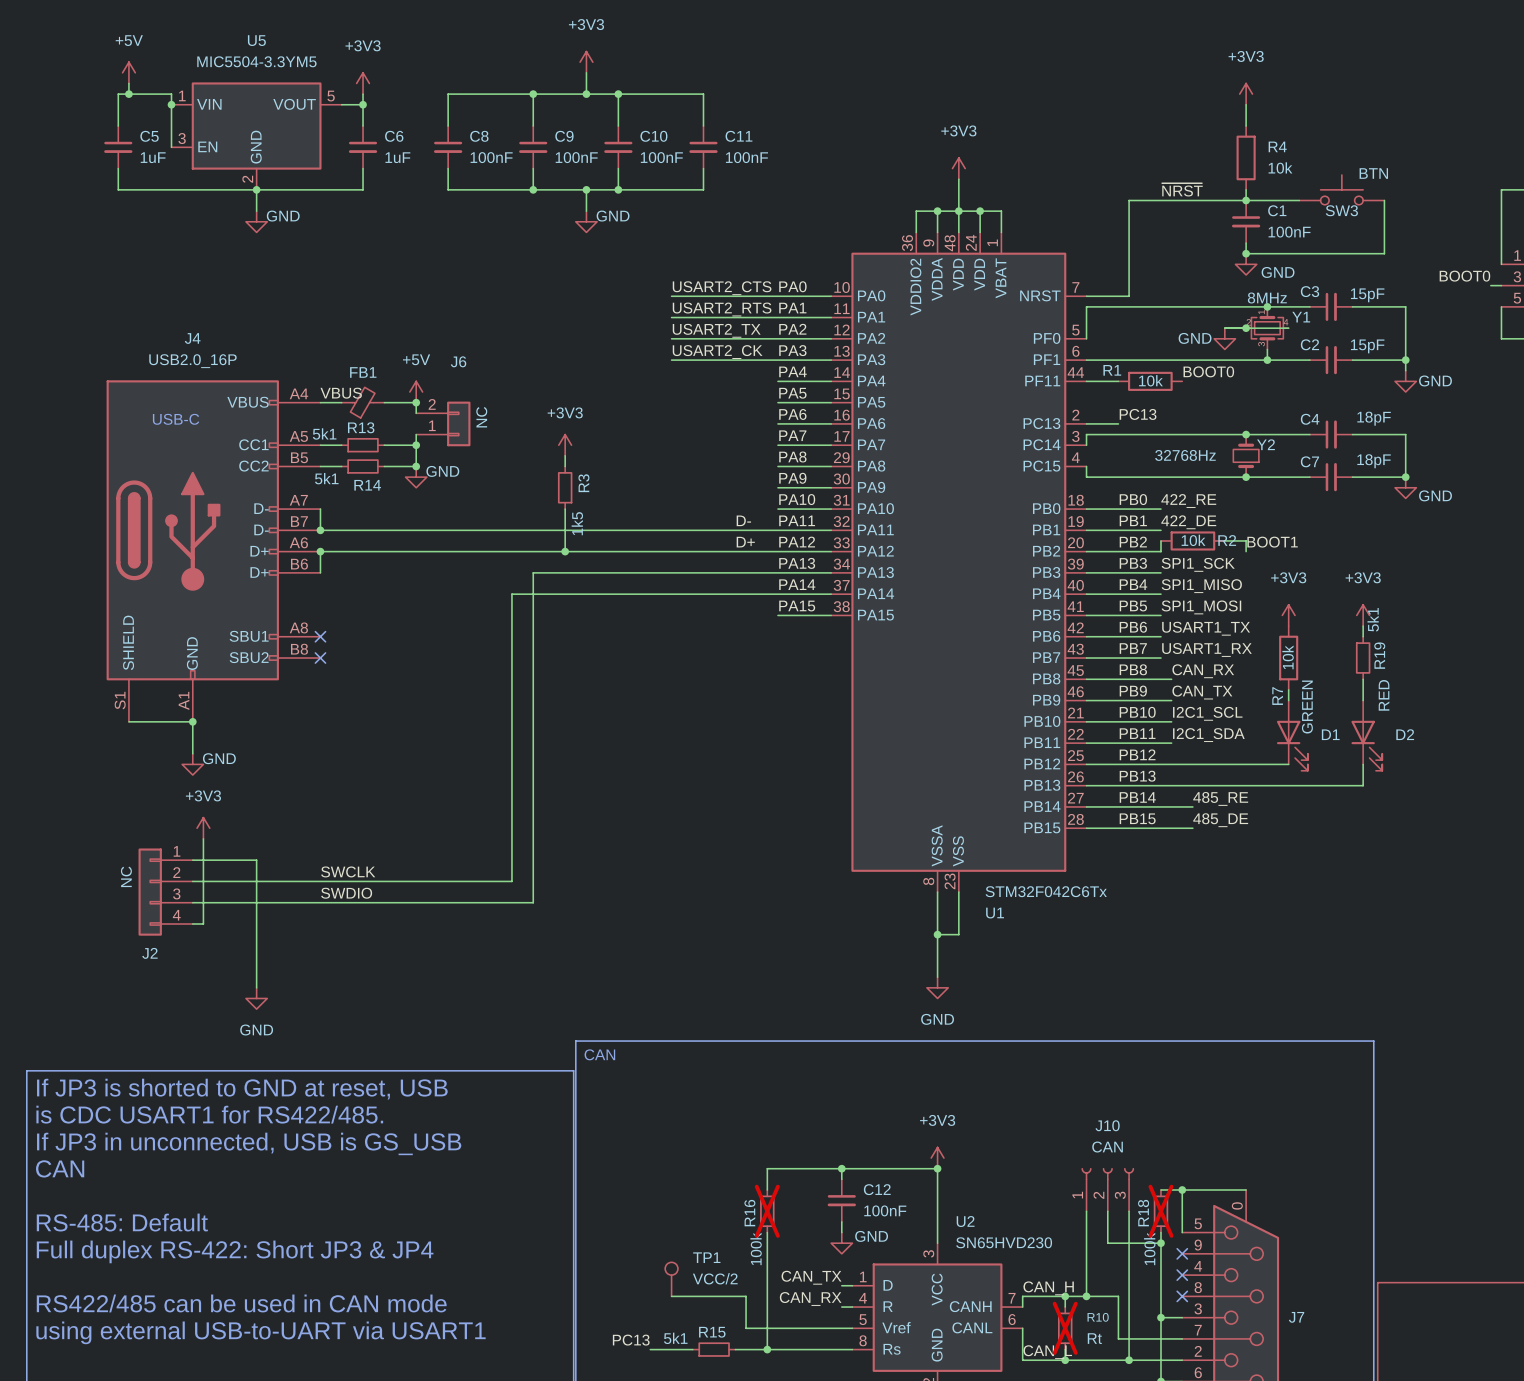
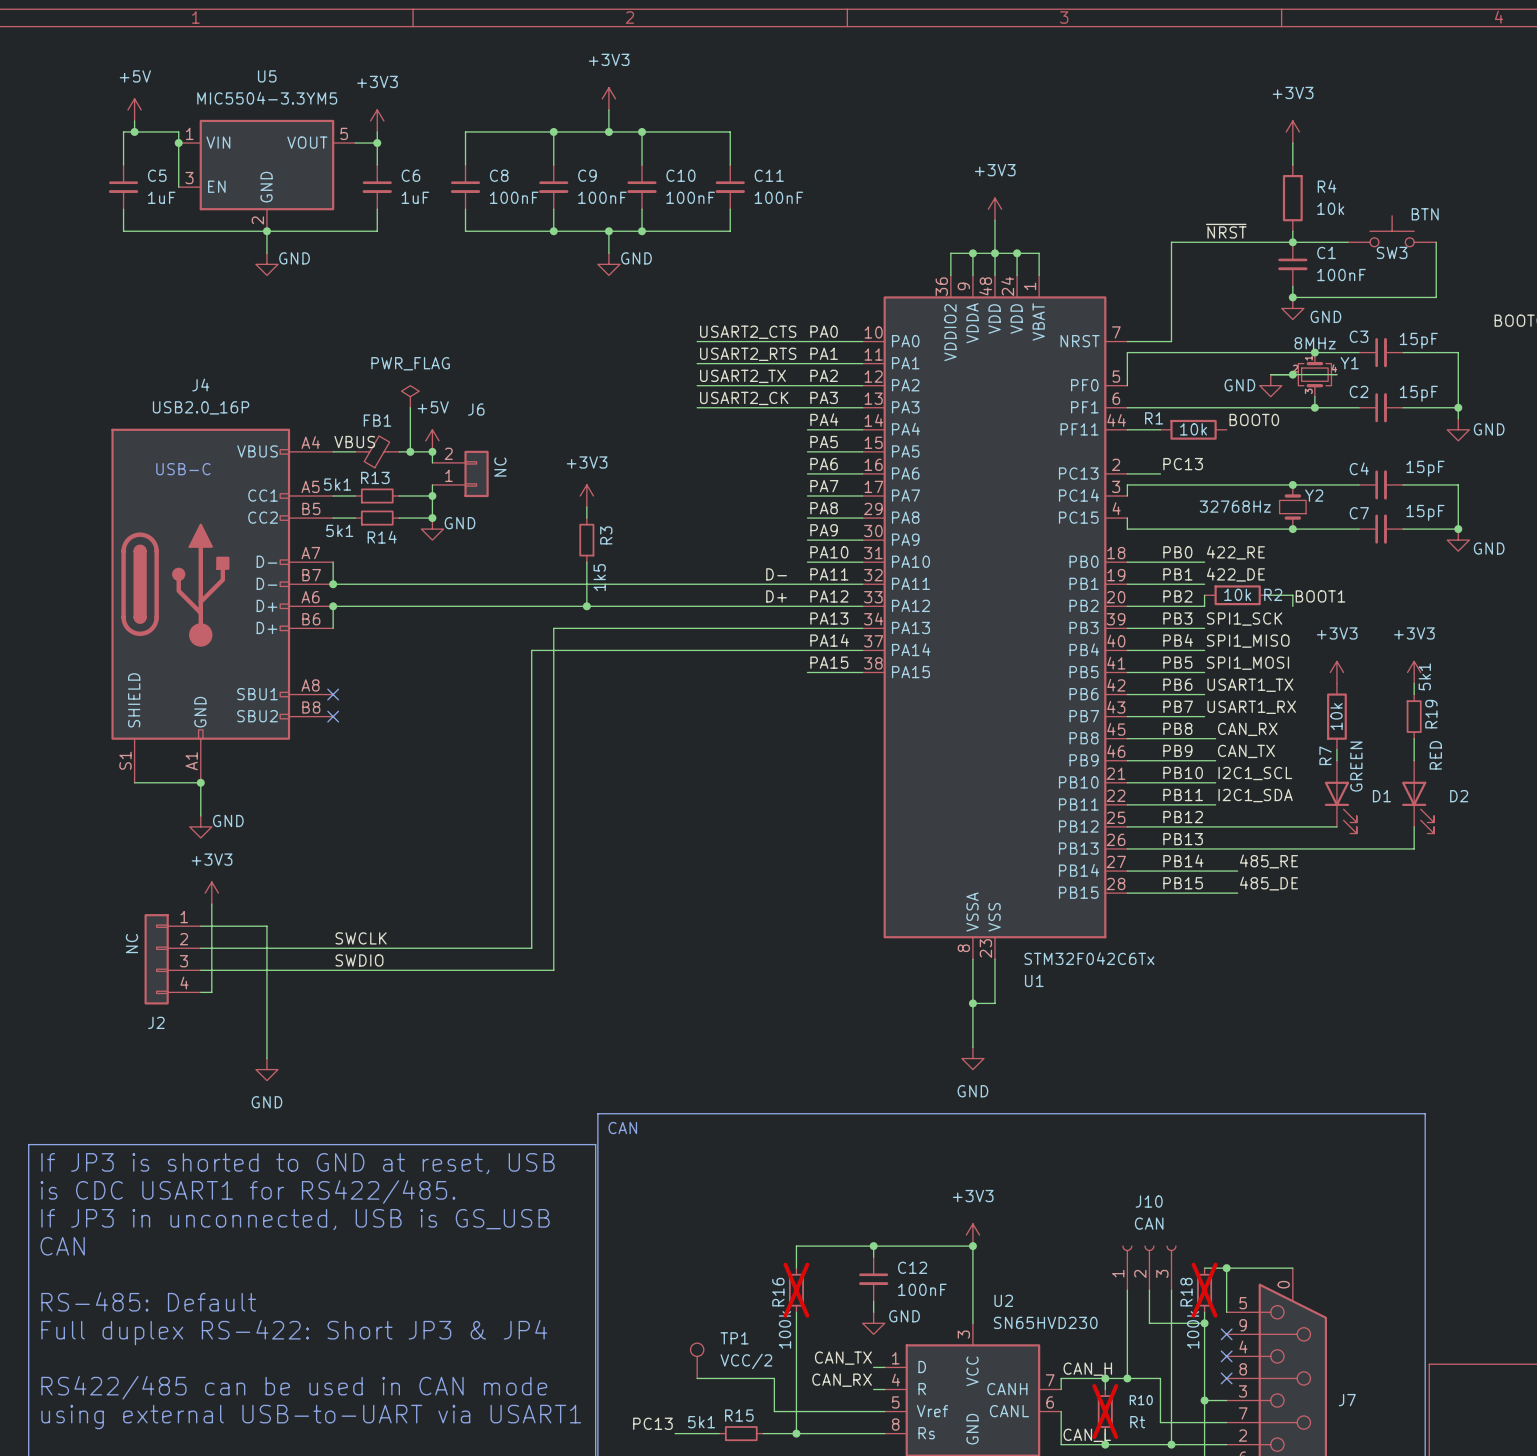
power symbol: none -> PWR_FLAG (410, 396)
wire: none -> (410, 407) (410, 451)
junction: none -> (410, 451)
C4 value: 18pF (1374, 418) -> 15pF (1425, 468)
C7 value: 18pF (1374, 461) -> 15pF (1425, 512)

